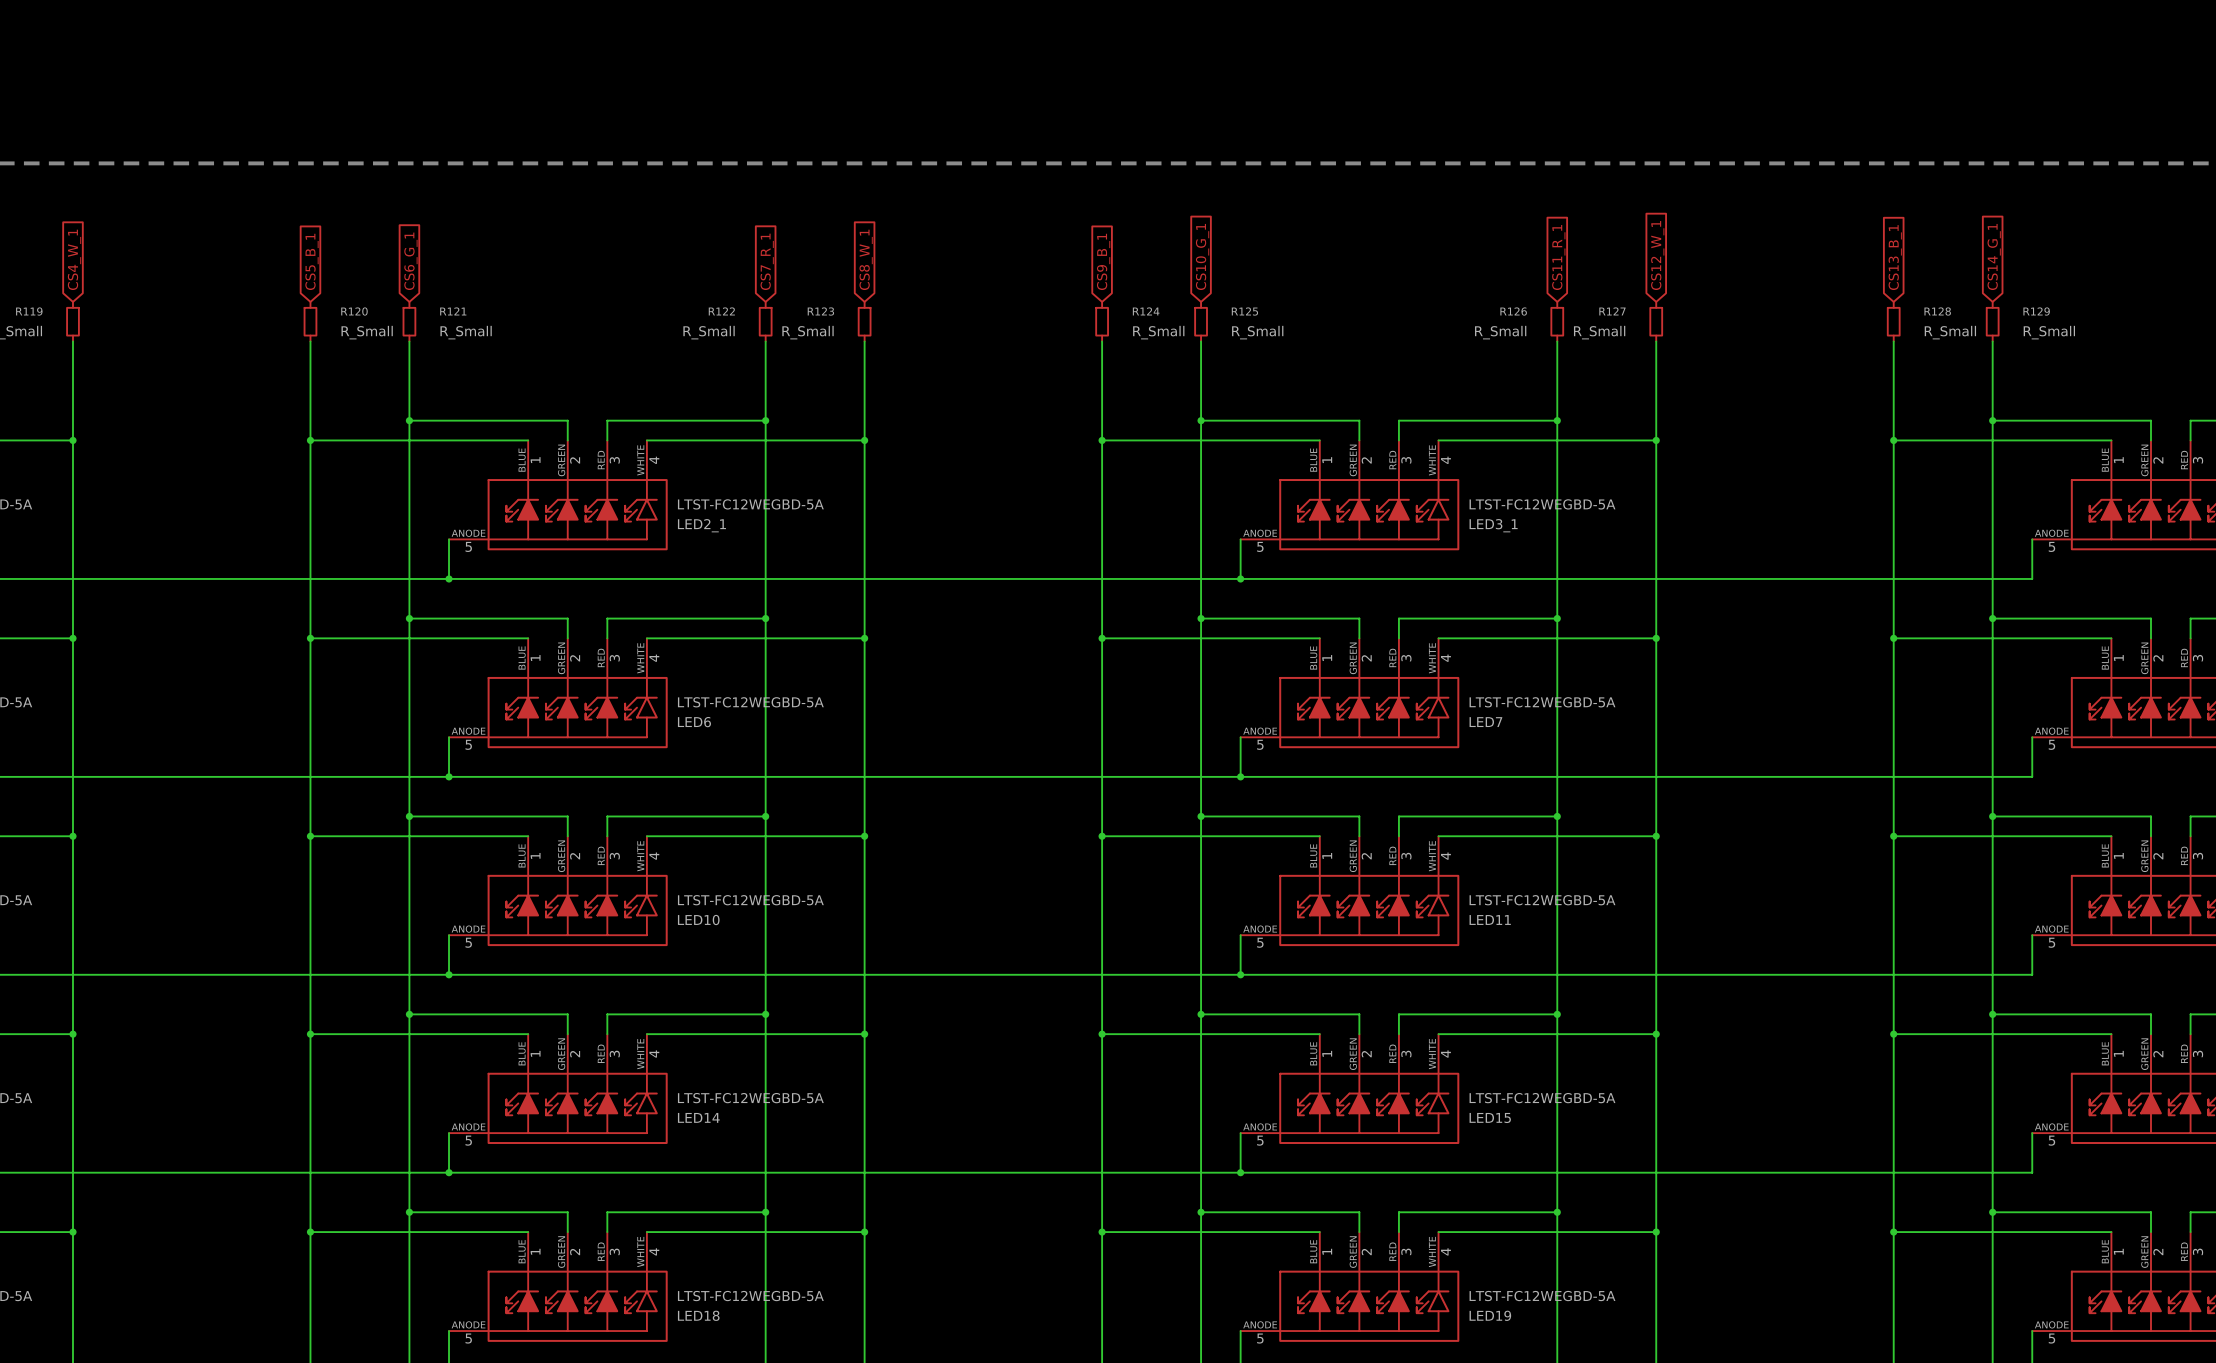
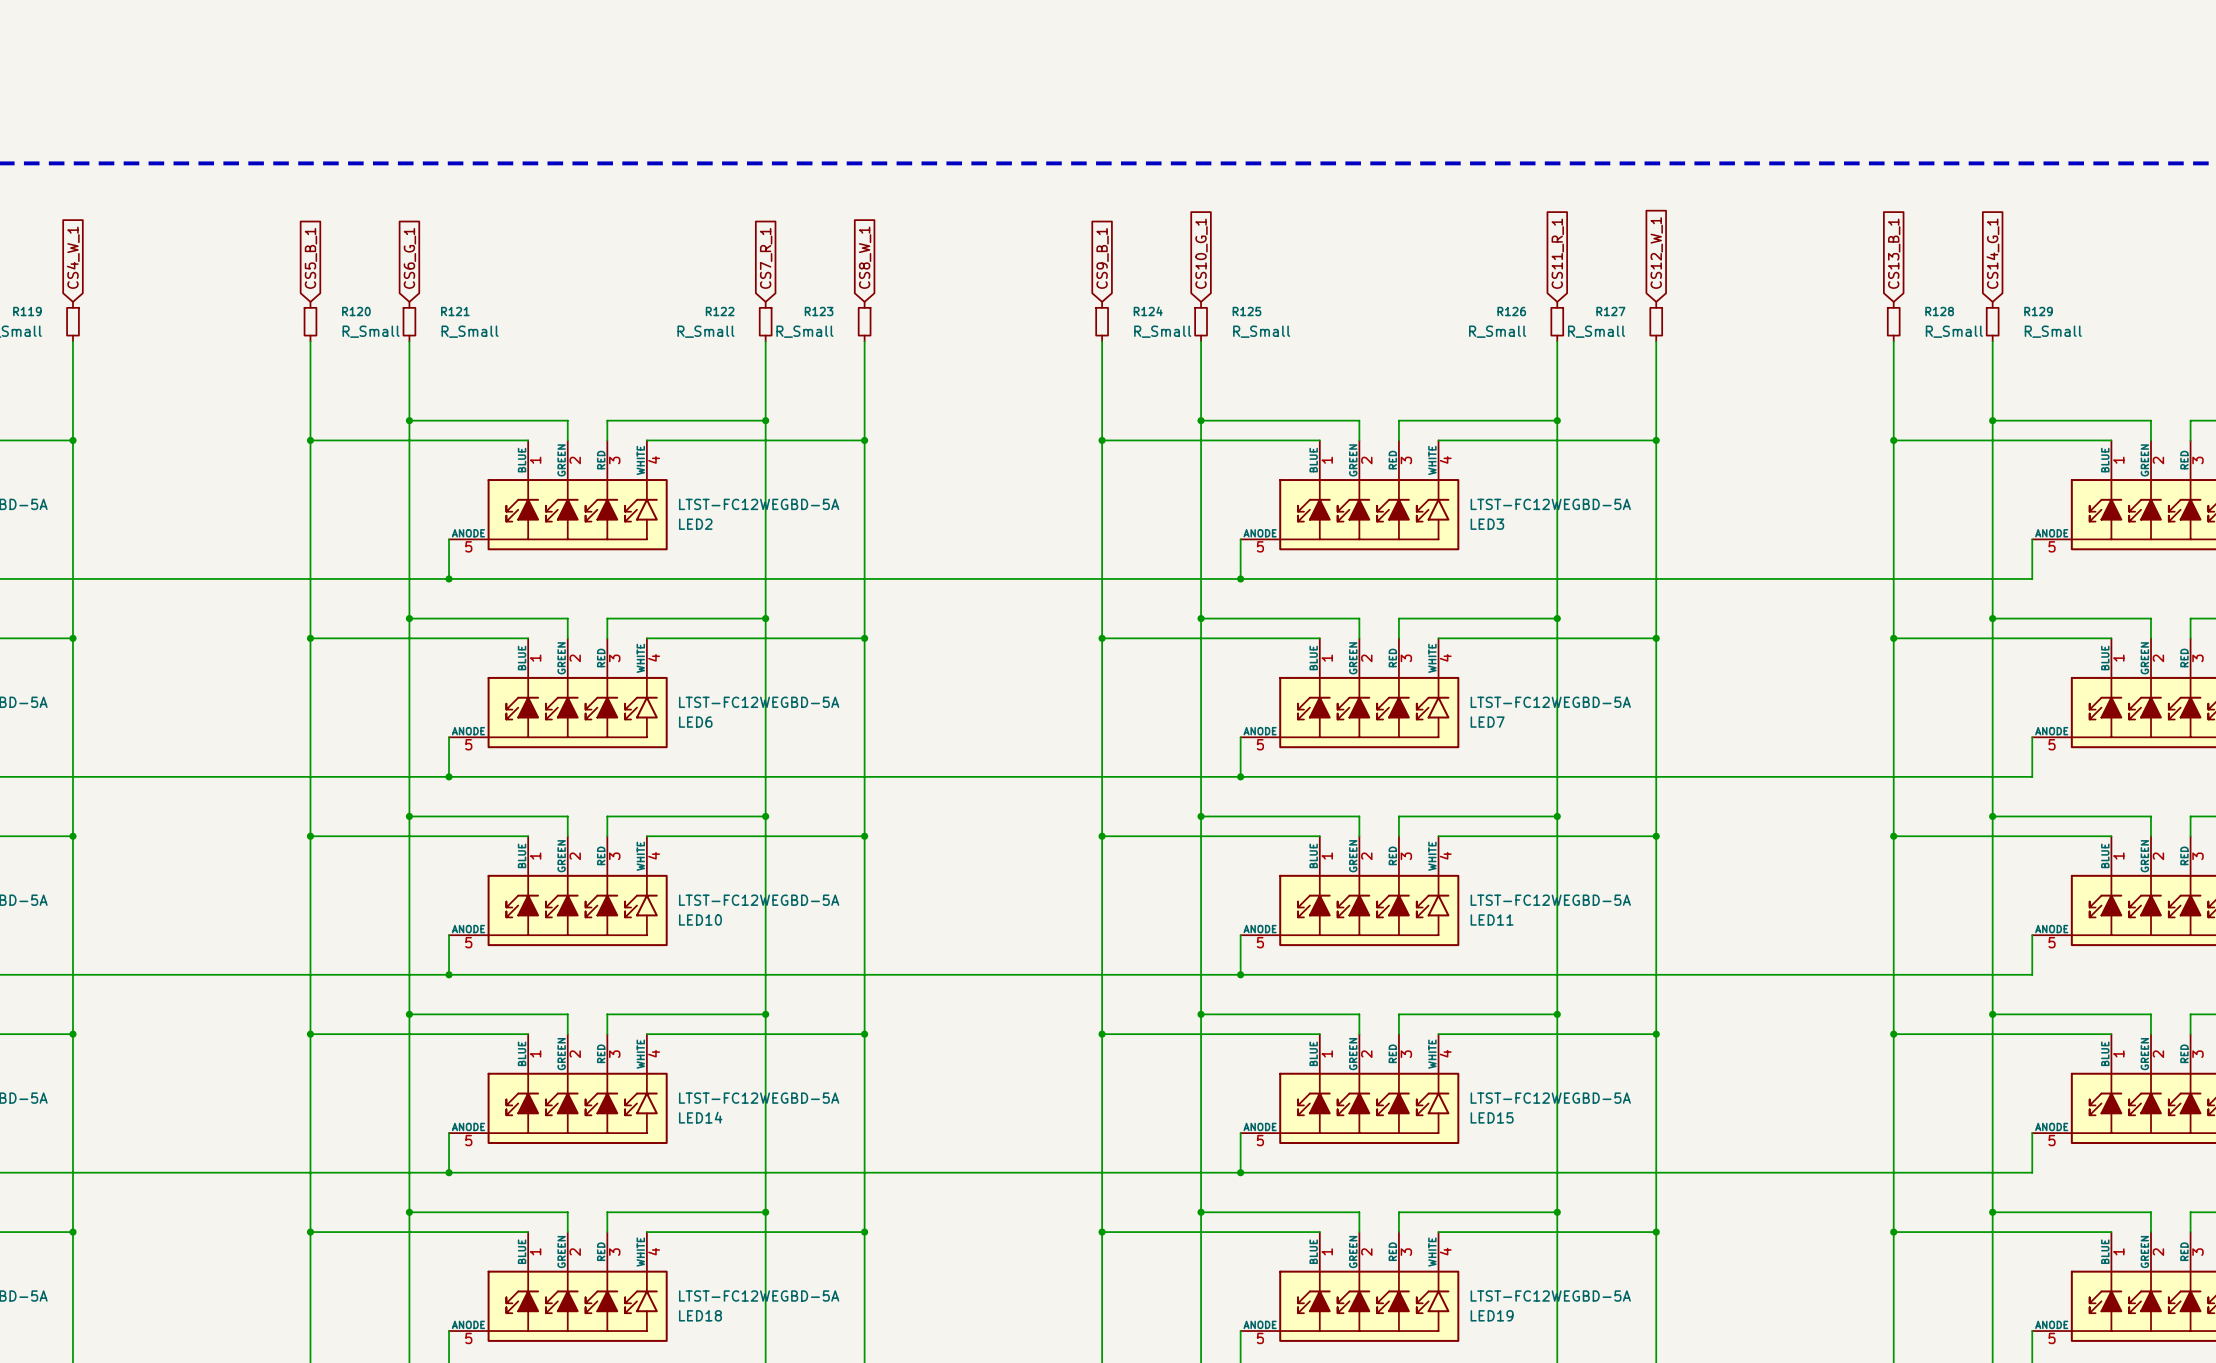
LED2_1 name: LED2_1 (701, 525) -> LED2 (695, 524)
LED3_1 name: LED3_1 (1493, 525) -> LED3 (1487, 524)

